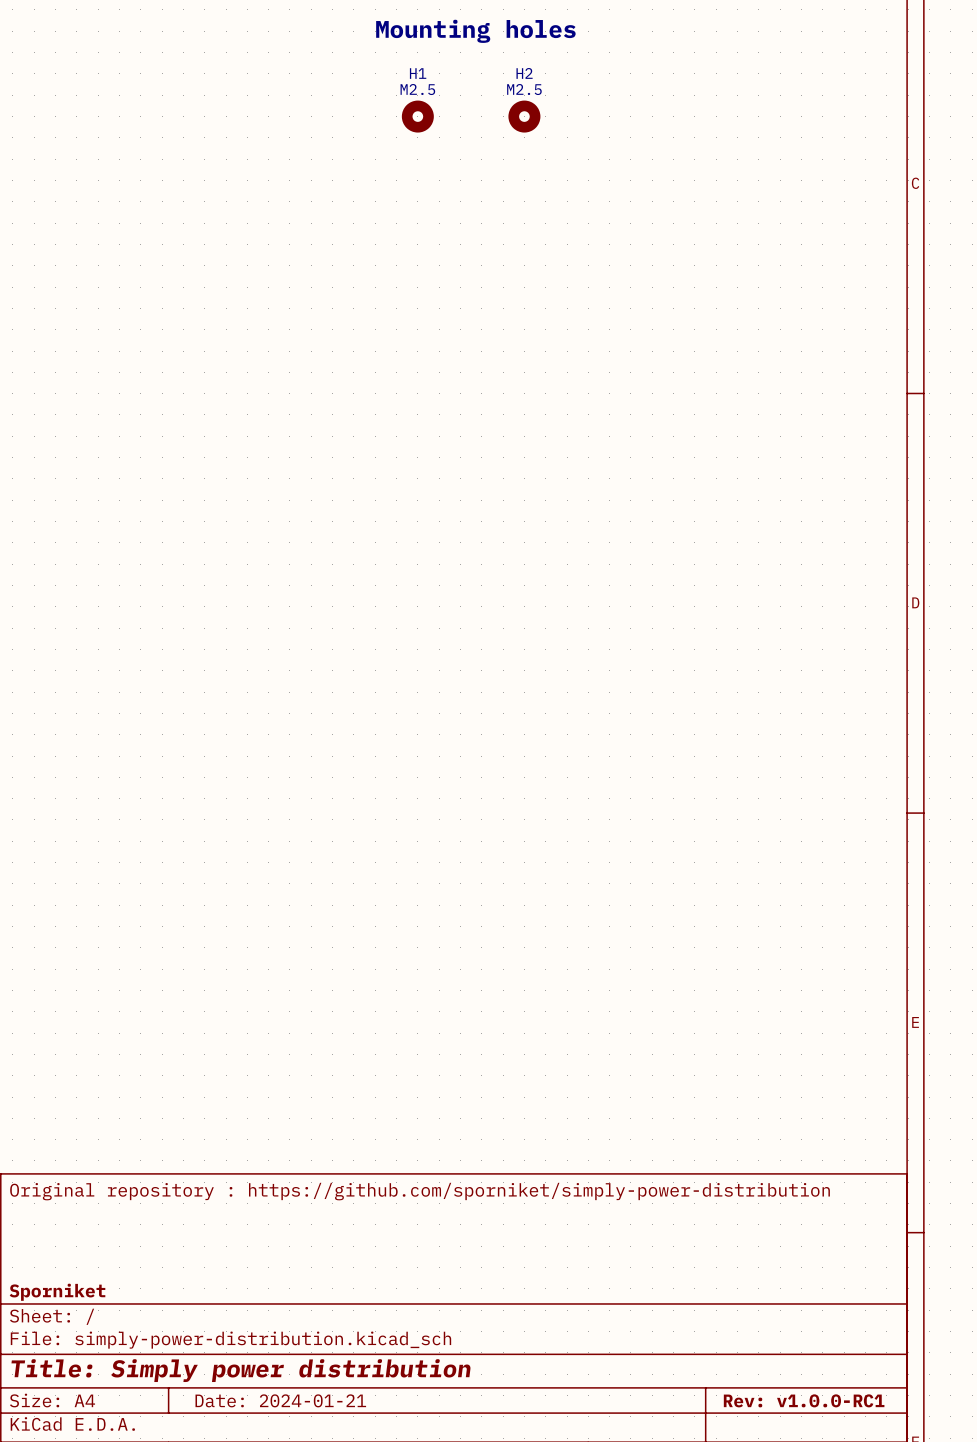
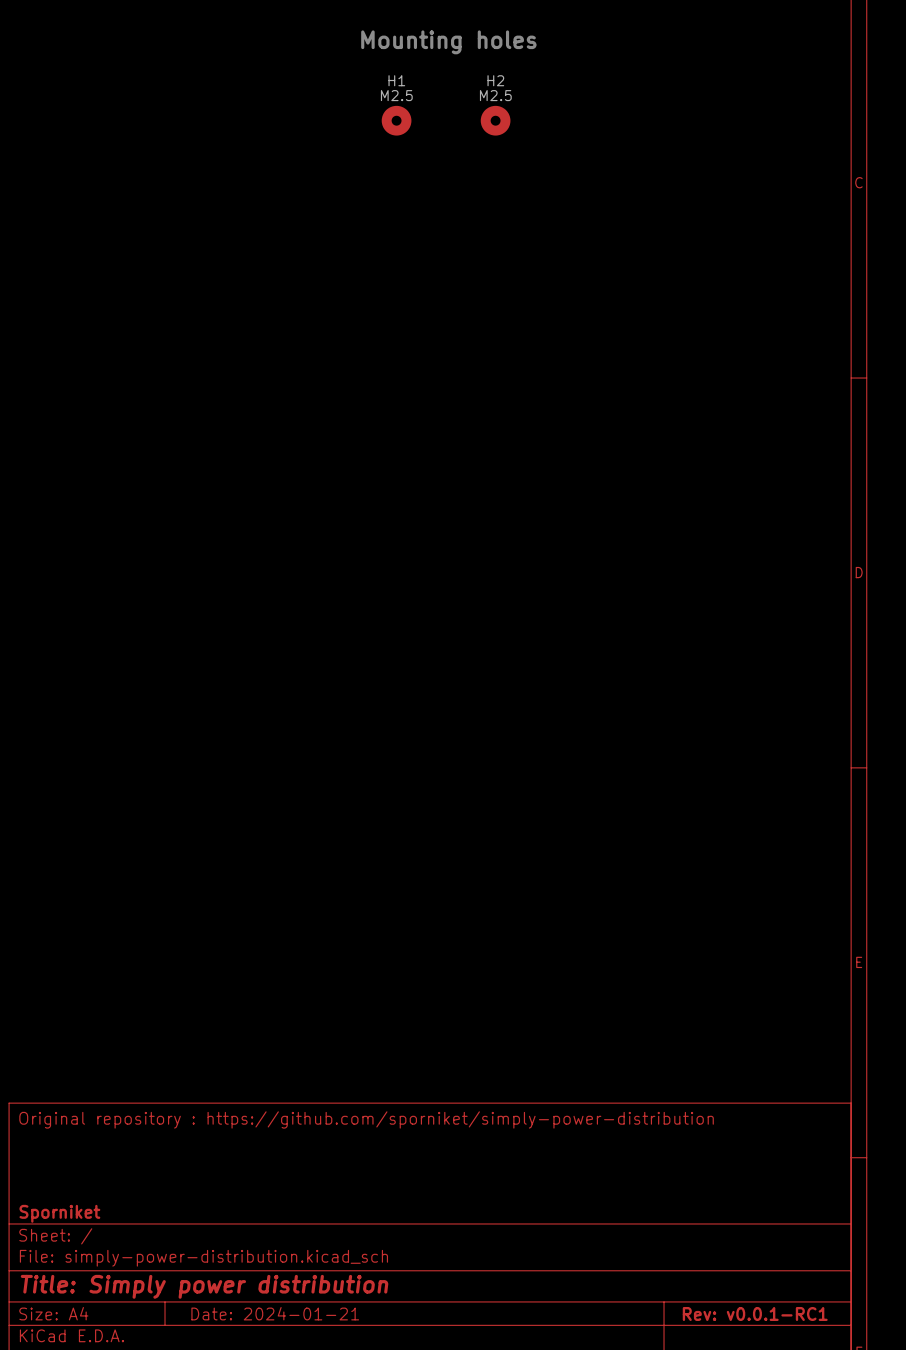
title block: Rev: v1.0.0-RC1 (804, 1400) -> Rev: v0.0.1-RC1 (755, 1313)

